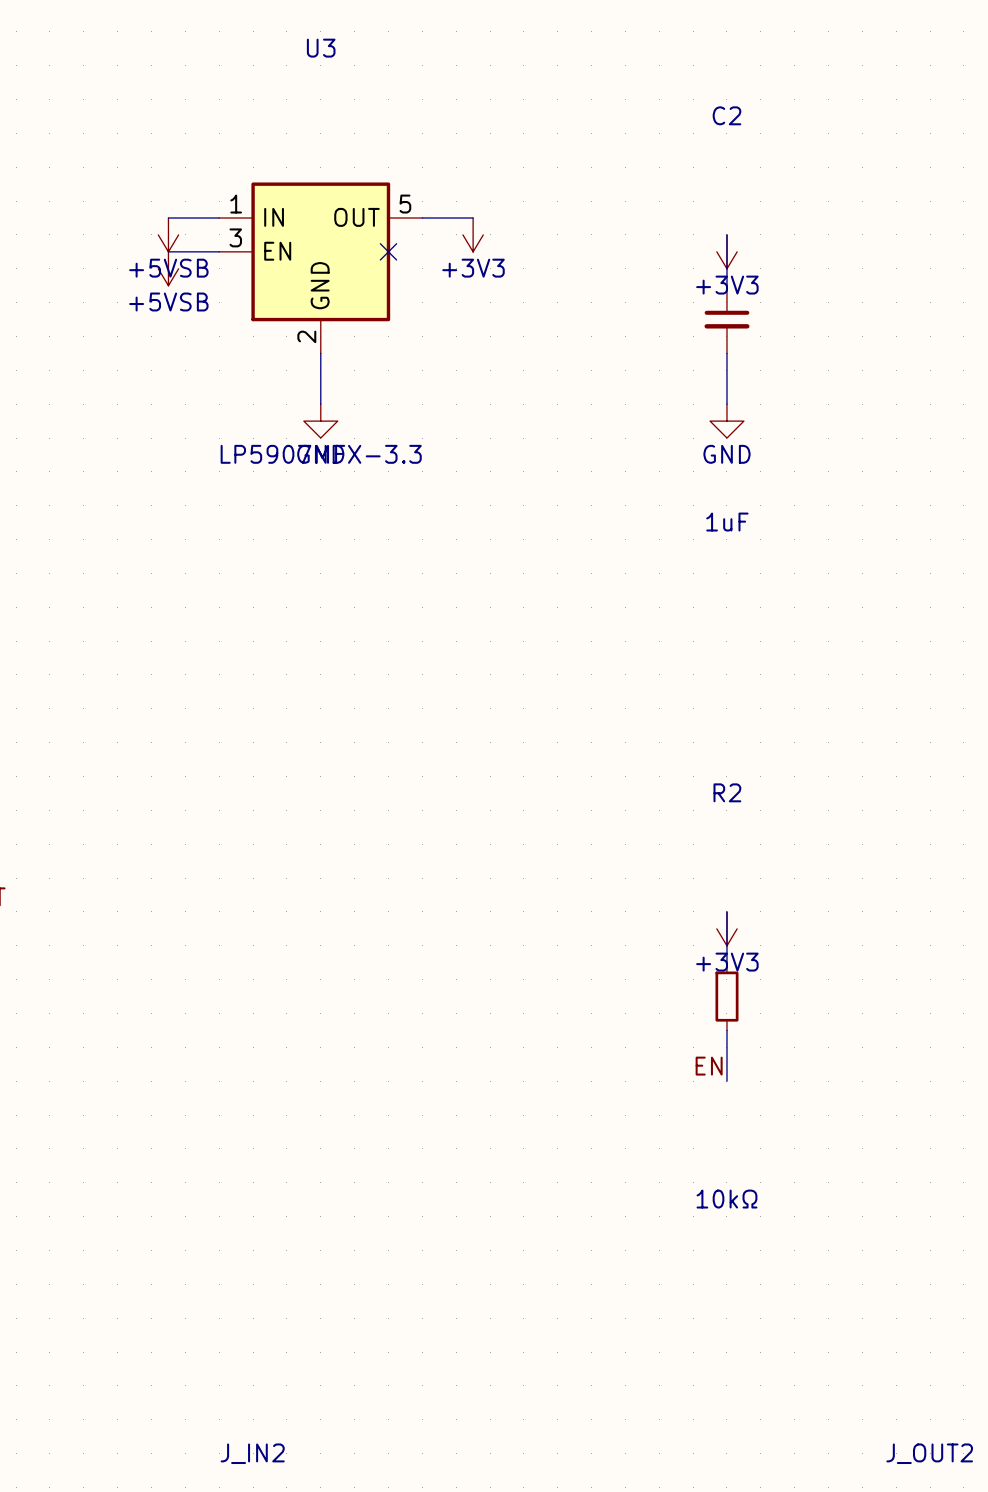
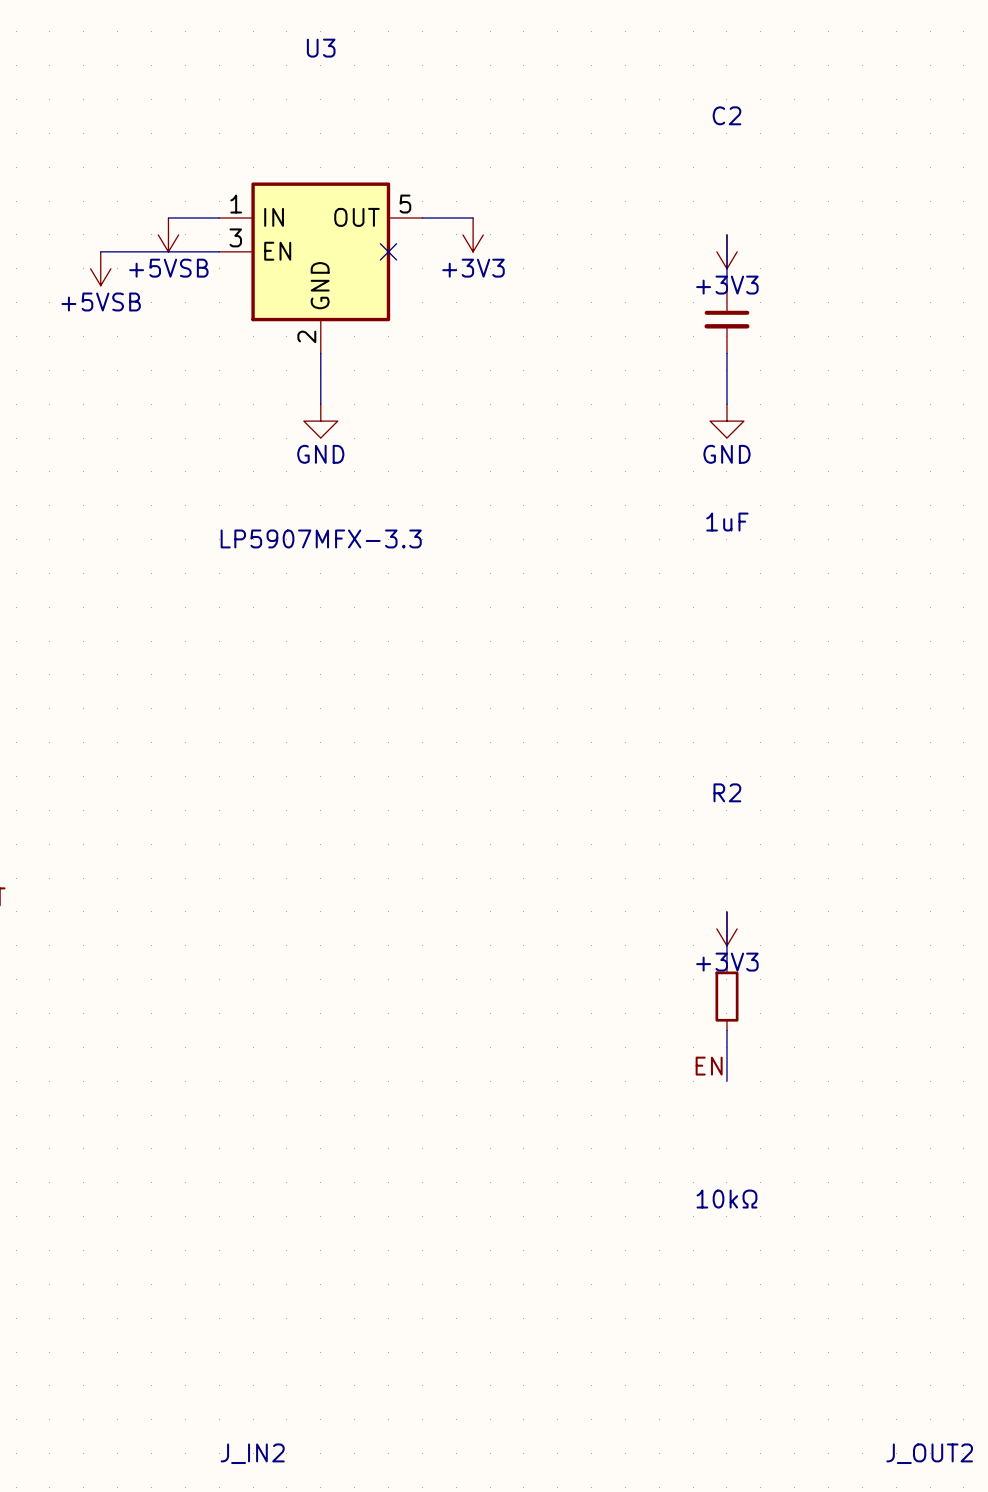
wire: none -> (100, 251) (168, 251)
power symbol position: +5VSB (168, 268) -> +5VSB (100, 268)
U3 value position: LP5907MFX-3.3 (321, 454) -> LP5907MFX-3.3 (321, 538)

